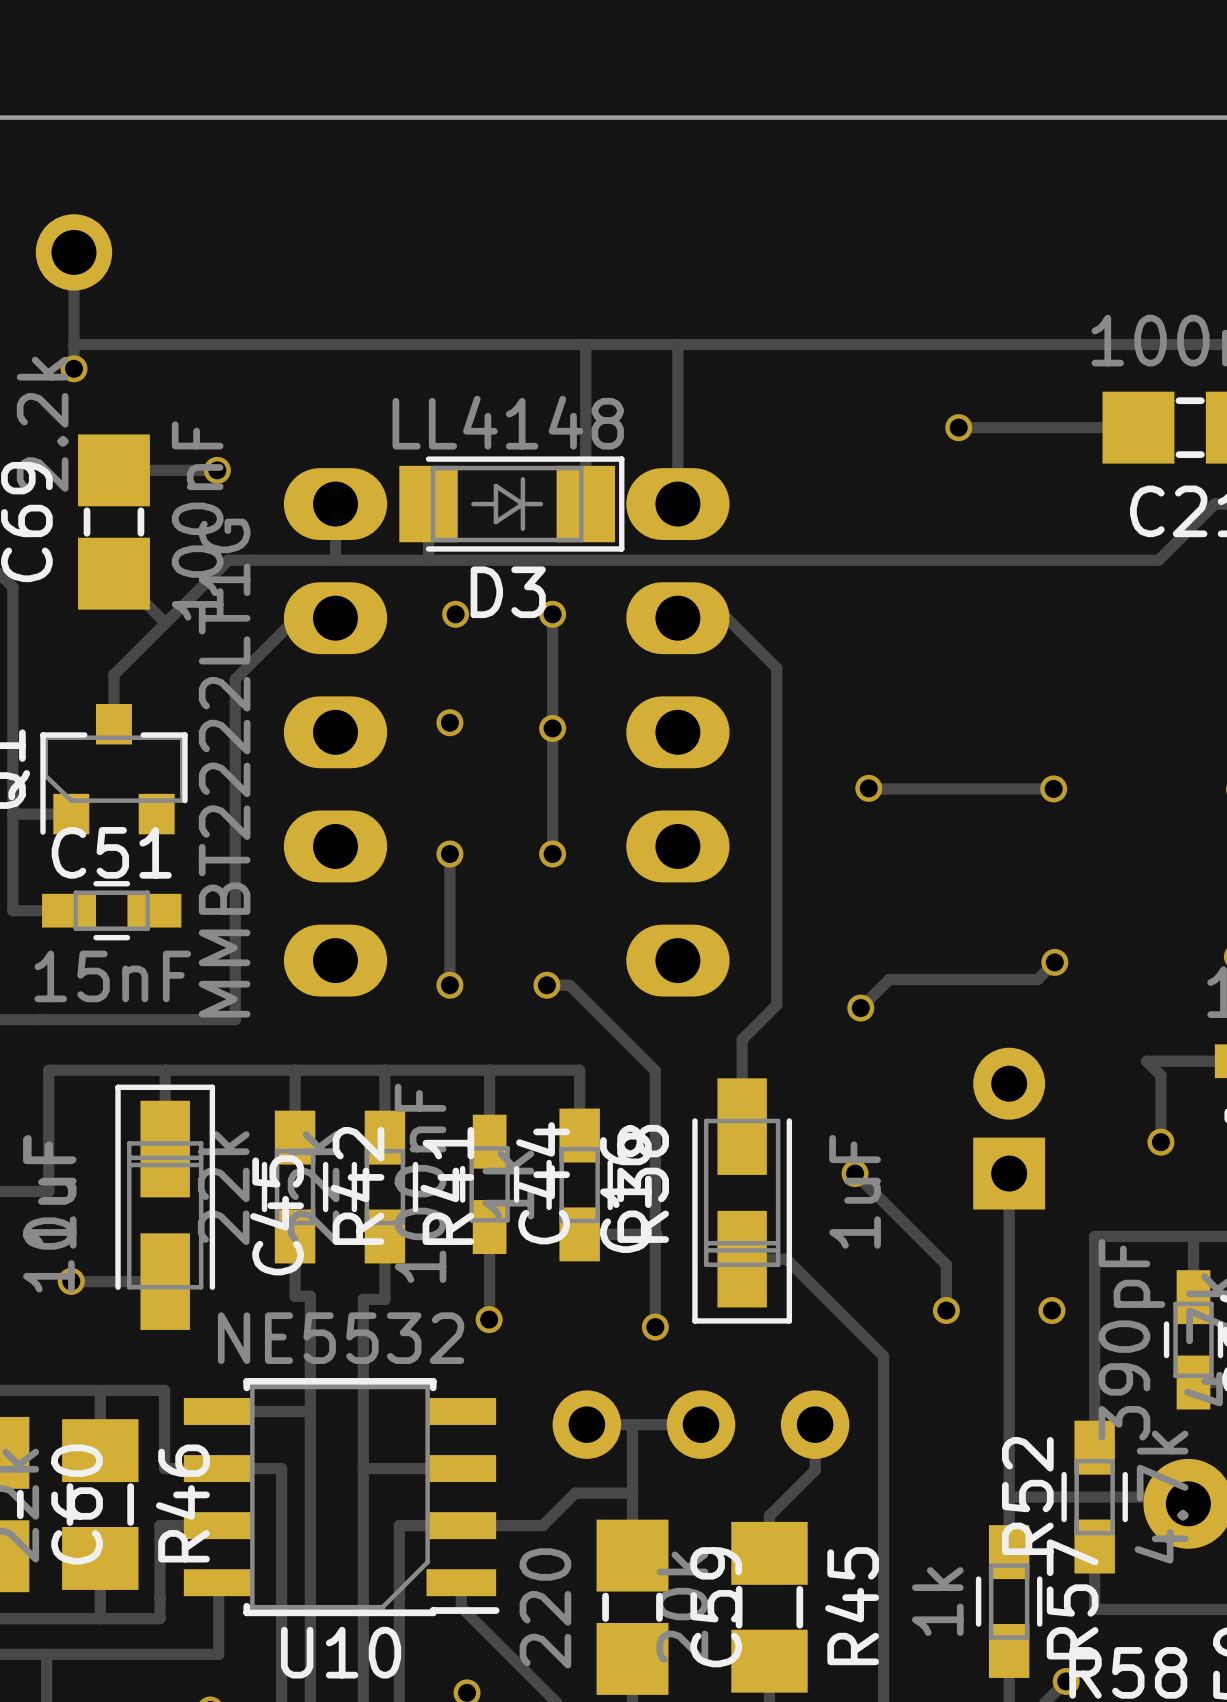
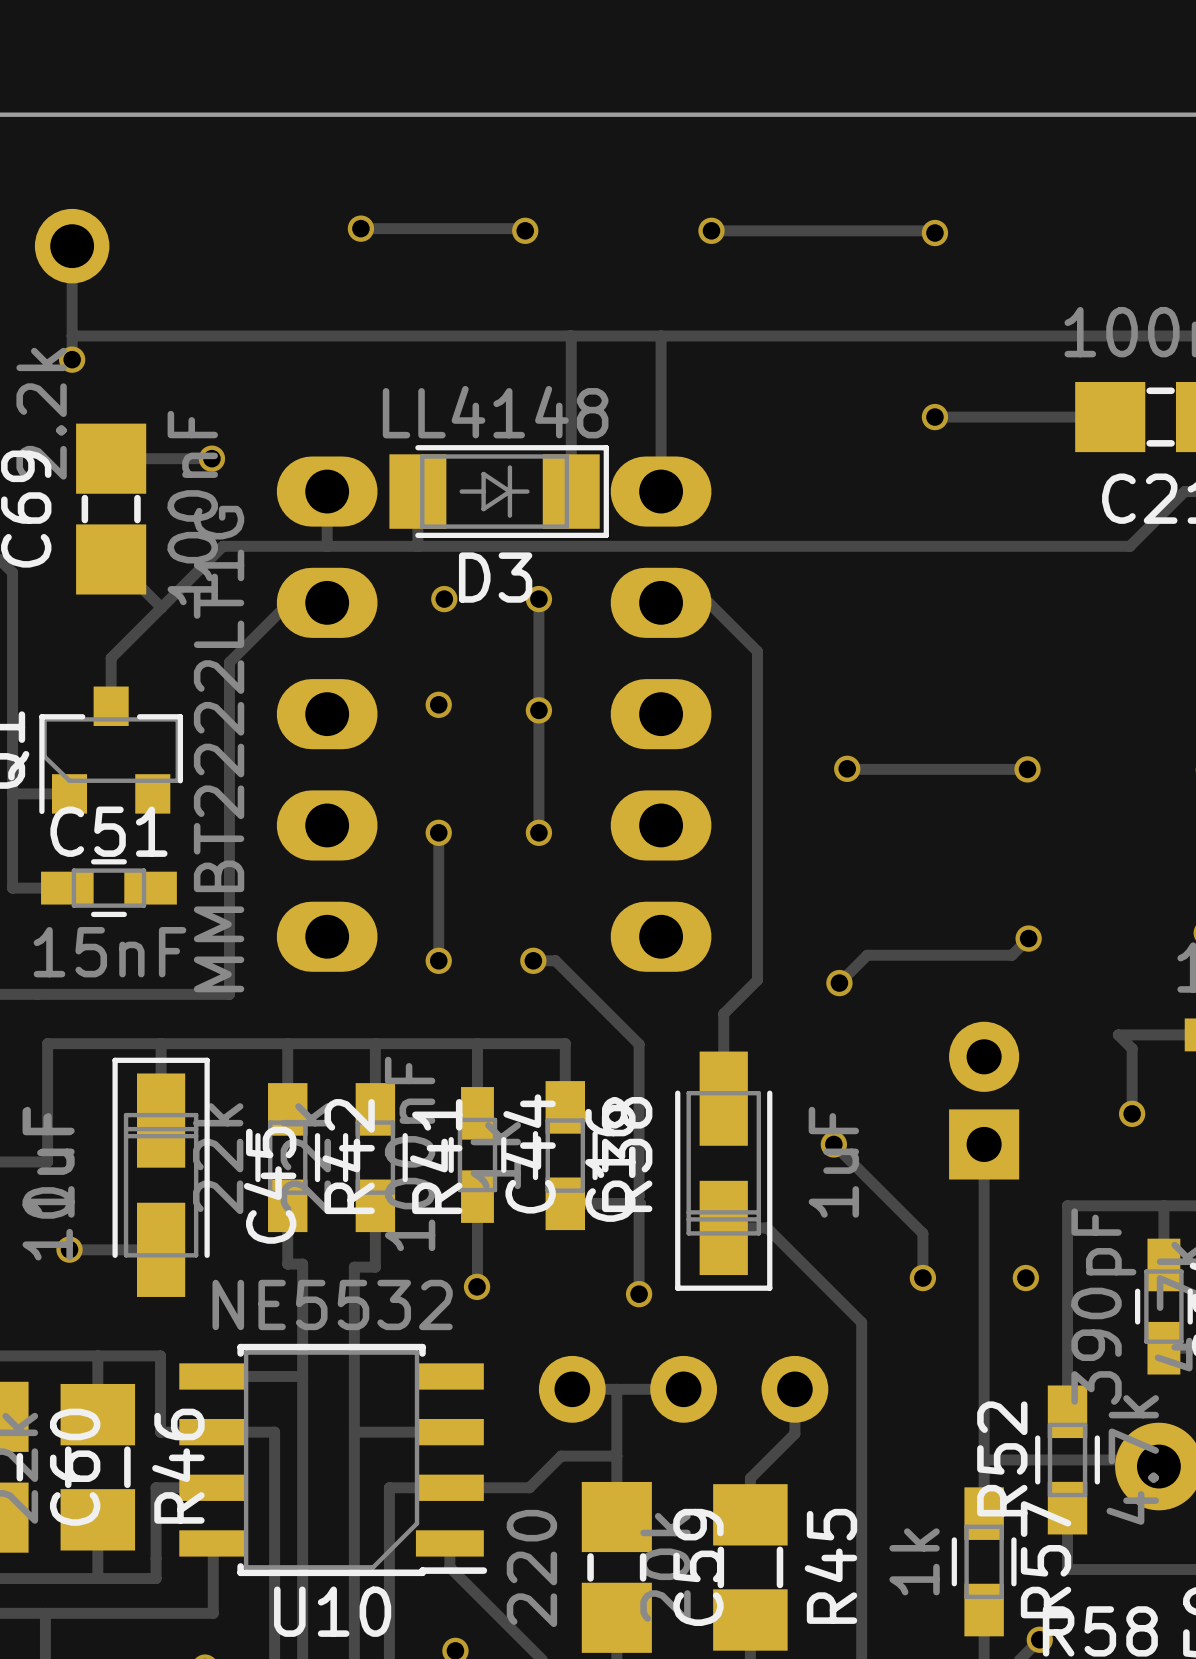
track: none -> (360, 228) (523, 228) (525, 230)
via: none -> (360, 228)
via: none -> (525, 230)
track: none -> (711, 230) (932, 230) (934, 233)
via: none -> (711, 230)
via: none -> (934, 233)

